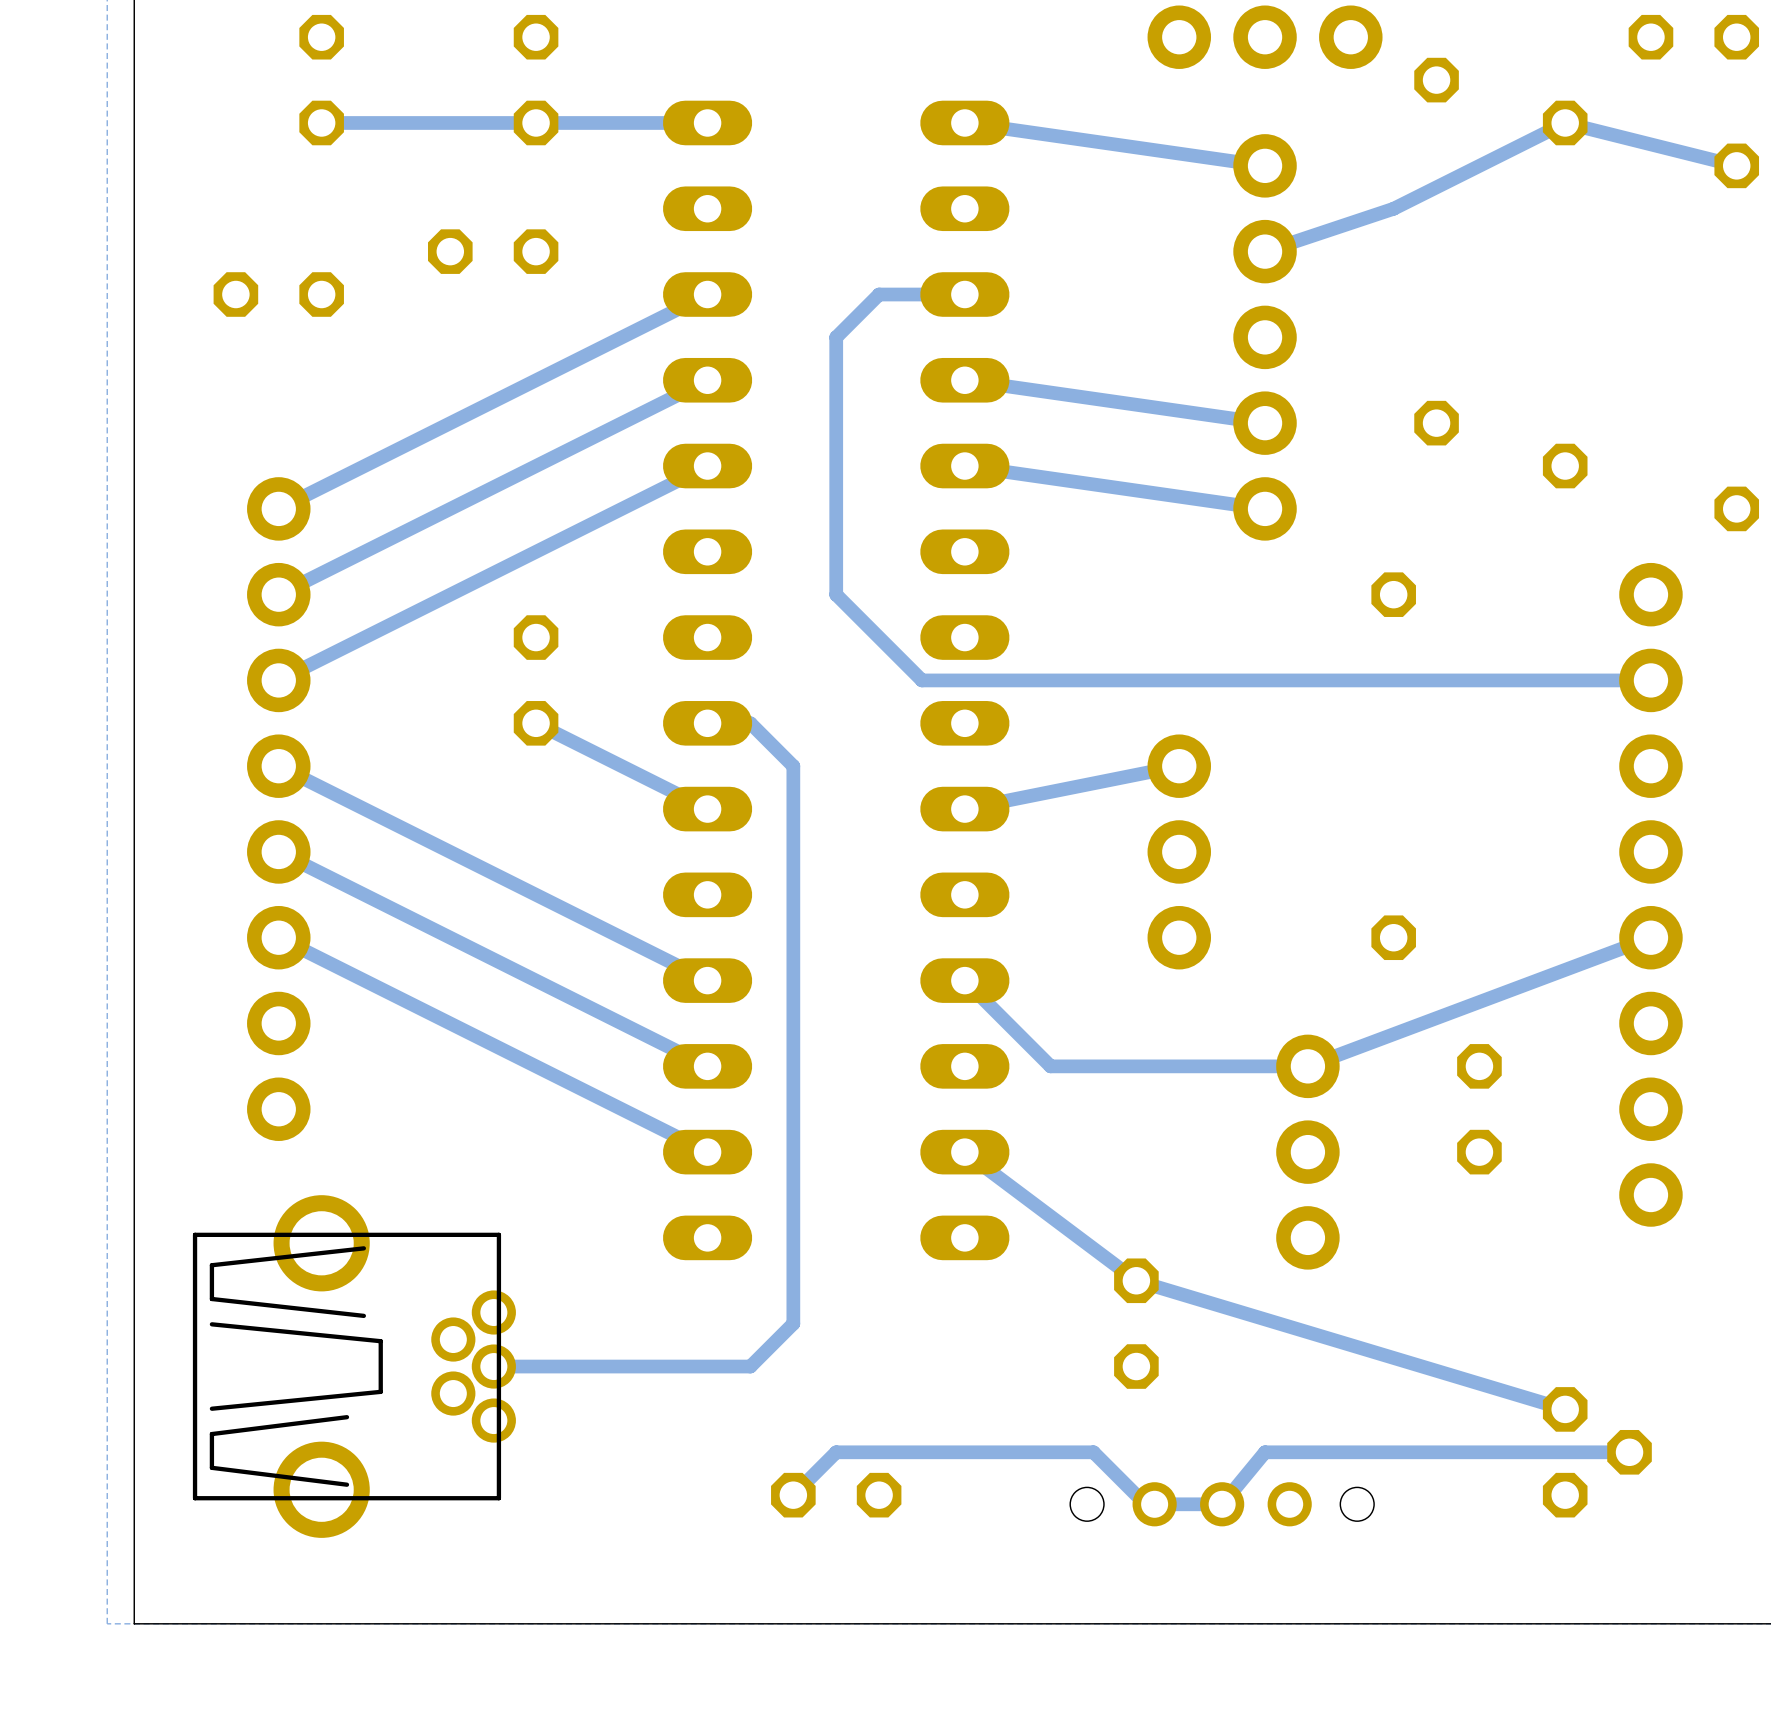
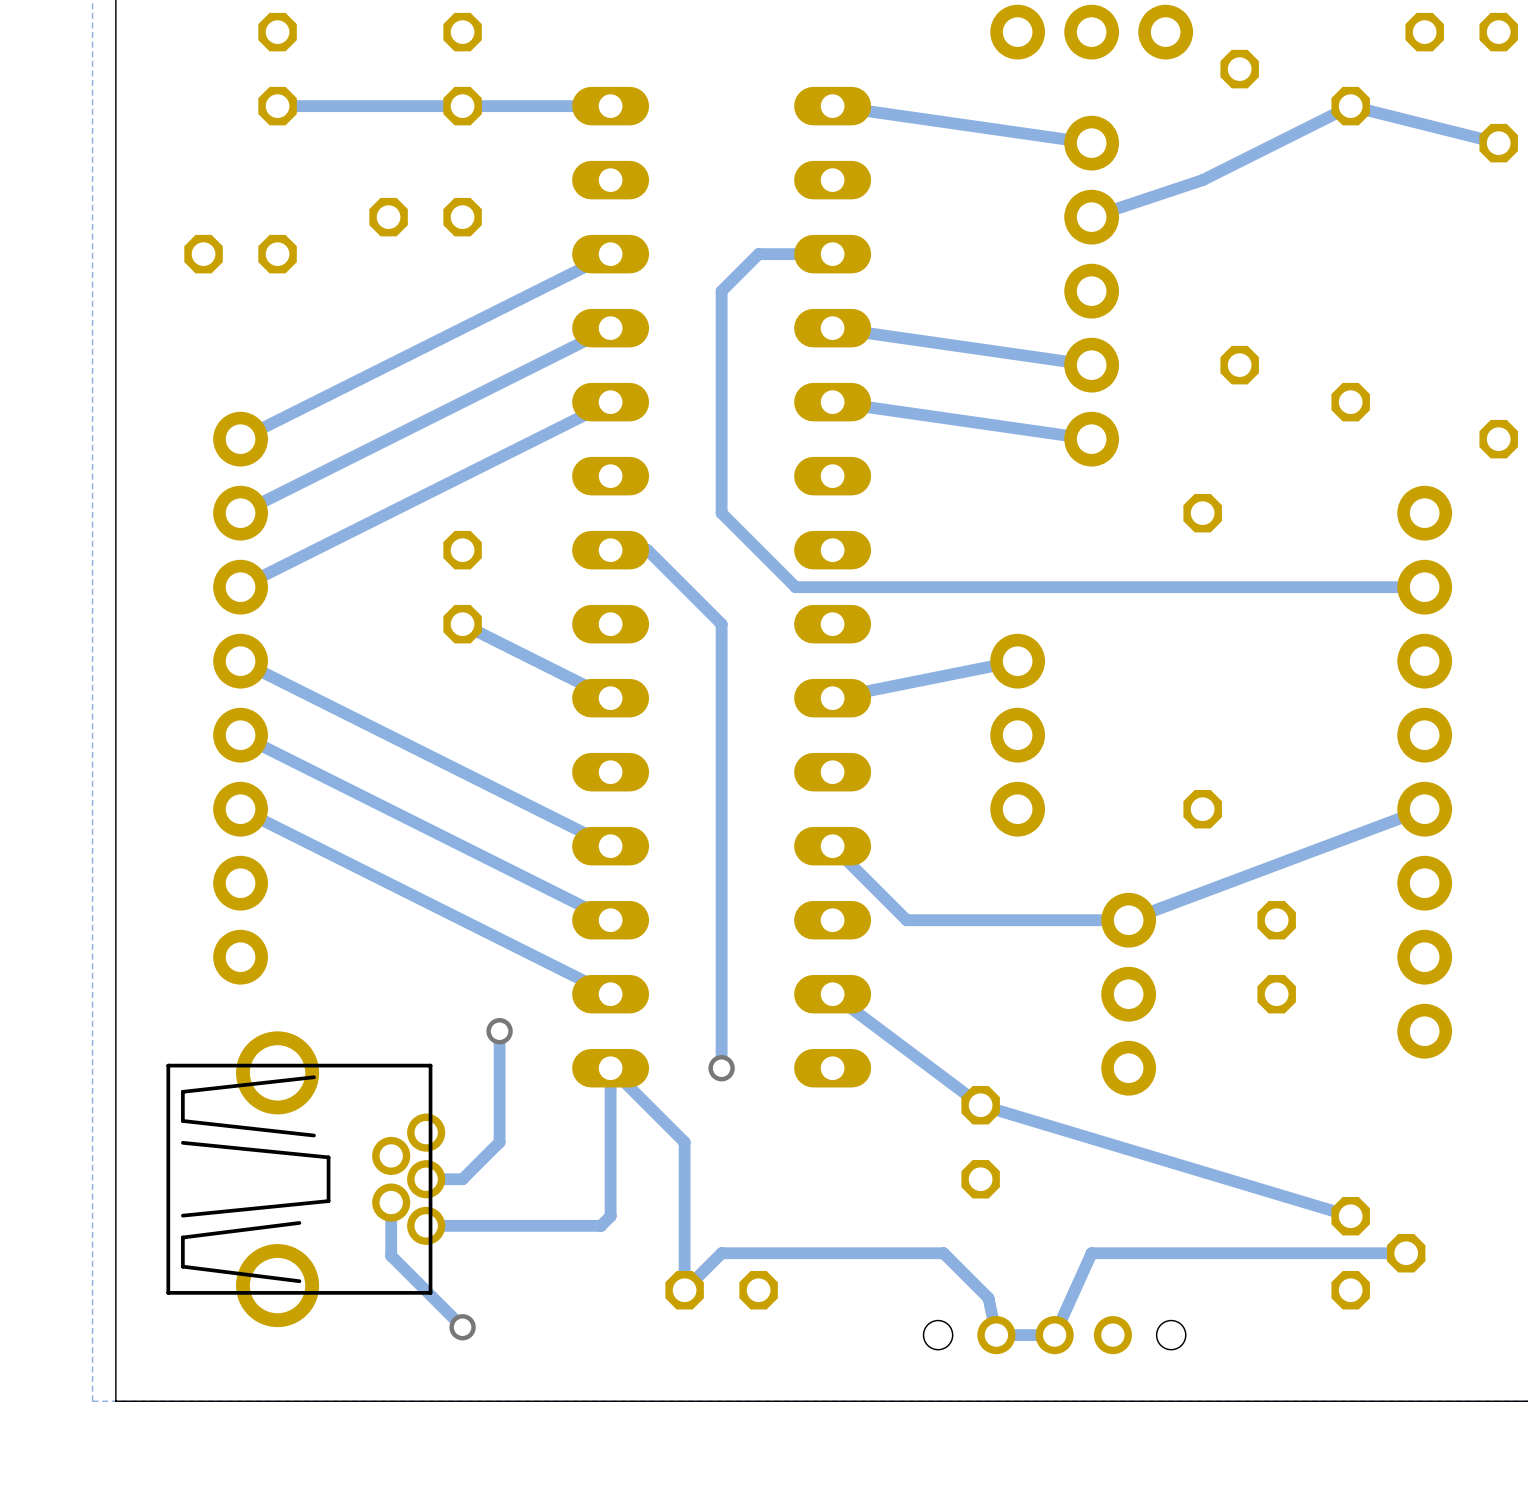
track: none -> (610, 550) (647, 550) (721, 624) (721, 1068)
track: (707, 723) (750, 723) (793, 766) (793, 1323) (750, 1366) (536, 1366) -> (499, 1031) (499, 1142) (462, 1179)
via: none -> (499, 1031)
via: none -> (721, 1068)
track: none -> (391, 1202) (391, 1255) (462, 1327)
track: none -> (426, 1225) (600, 1225) (610, 1216) (610, 1068) (684, 1142) (684, 1290)
track: (1265, 1452) (1222, 1504) (1145, 1504) -> (1091, 1253) (1054, 1335) (996, 1335) (988, 1298)
part position: (1222, 1504) -> (1054, 1335)
via: none -> (462, 1327)

